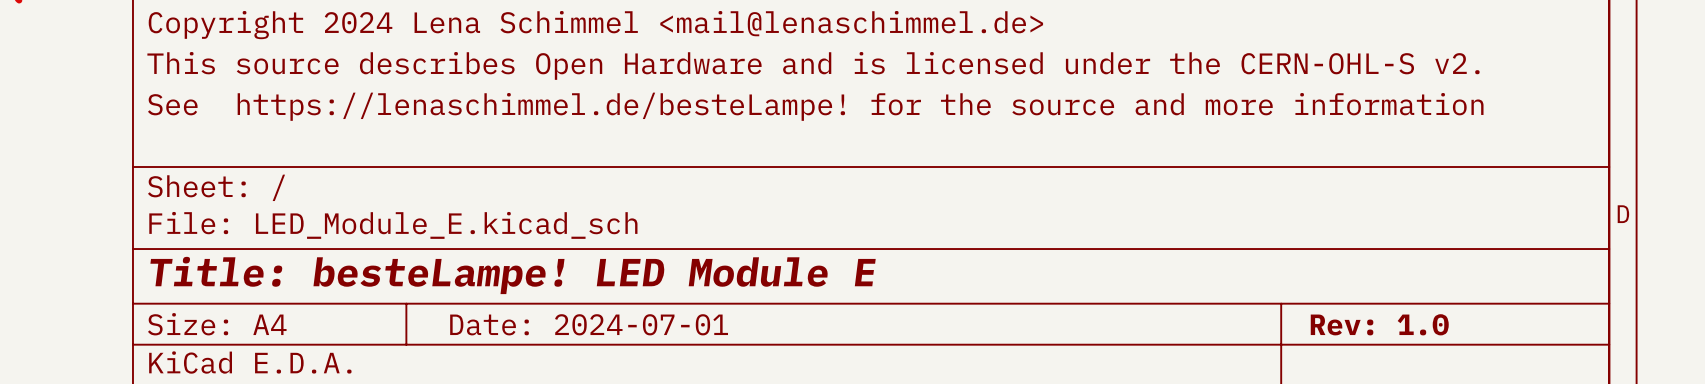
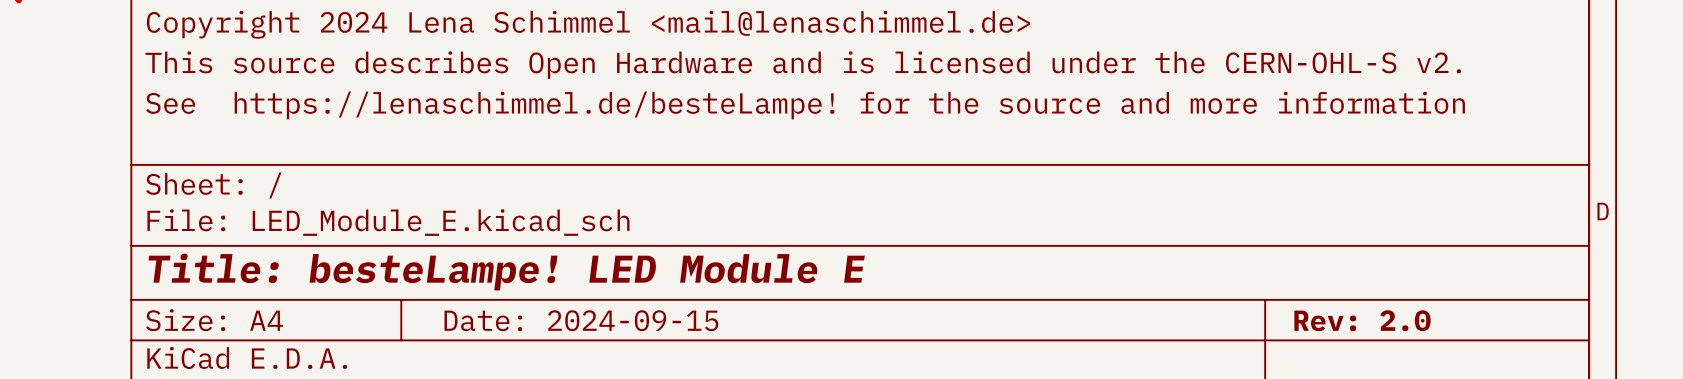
title block: Date: 2024-07-01 (589, 324) -> Date: 2024-09-15 (581, 320)
title block: Rev: 1.0 (1379, 324) -> Rev: 2.0 (1362, 320)

